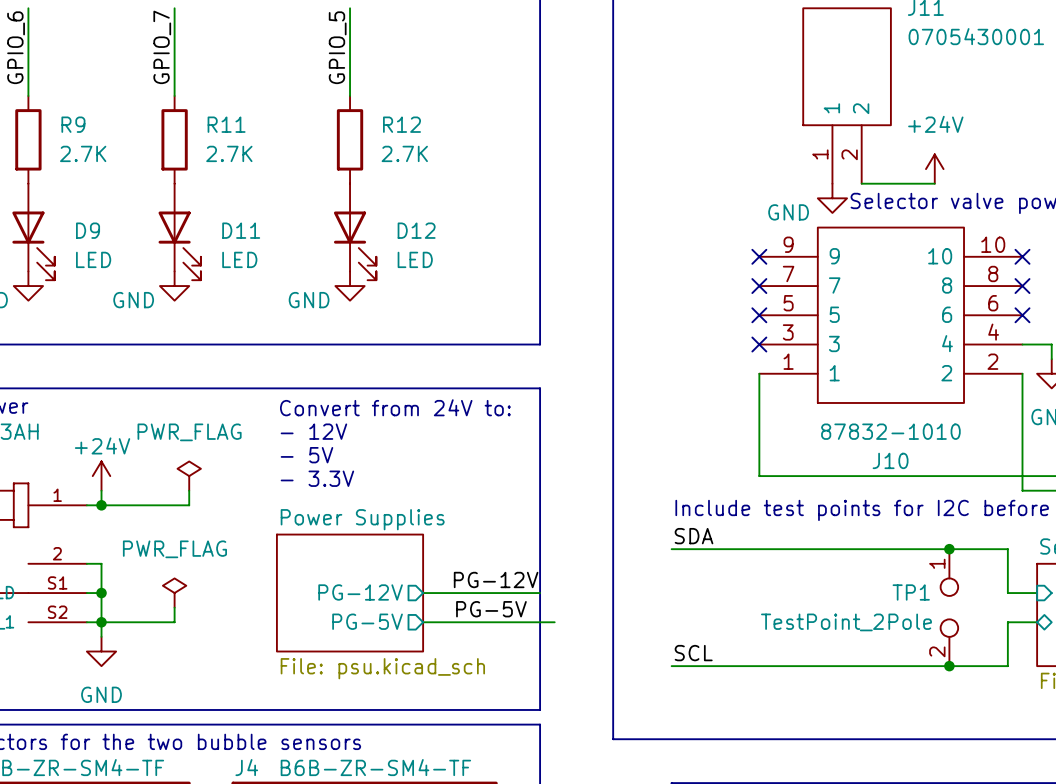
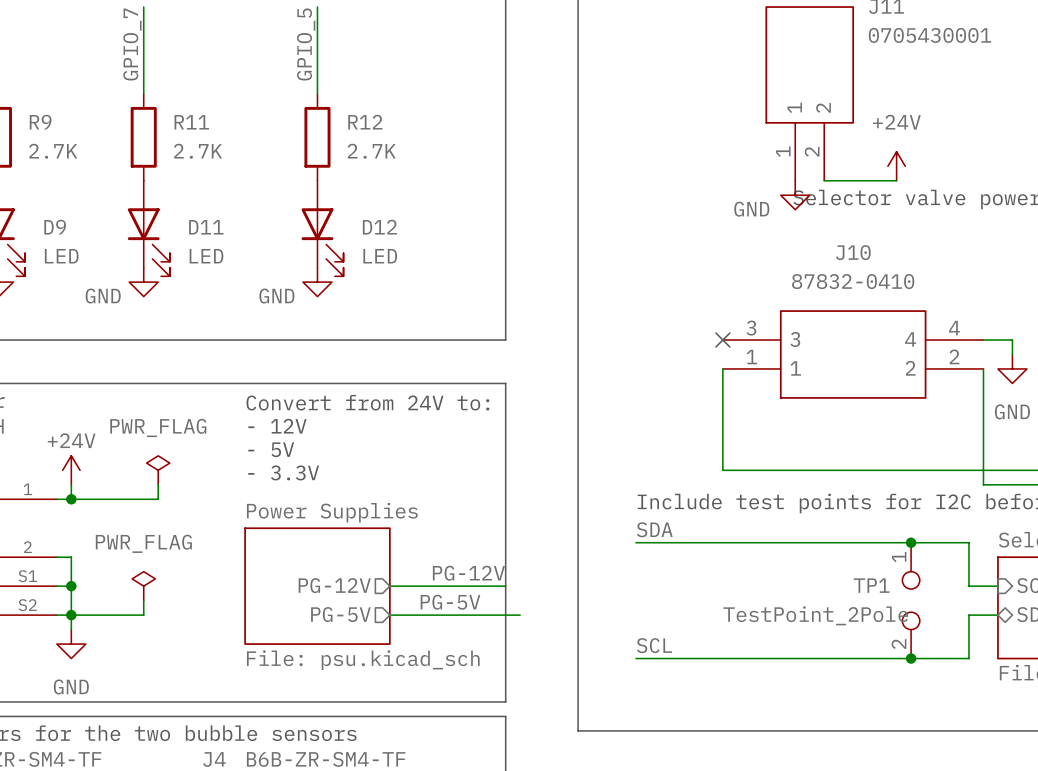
J10 symbol: [759, 226, 1023, 404] -> [722, 310, 984, 399]
no-connect mark: (759, 256) -> none
no-connect mark: (1022, 256) -> none
no-connect mark: (759, 286) -> none
no-connect mark: (1022, 286) -> none
no-connect mark: (759, 315) -> none
no-connect mark: (1022, 315) -> none
J10 value: 87832-1010 (890, 431) -> 87832-0410 (853, 281)
J10 name position: J10 (890, 460) -> J10 (853, 252)

